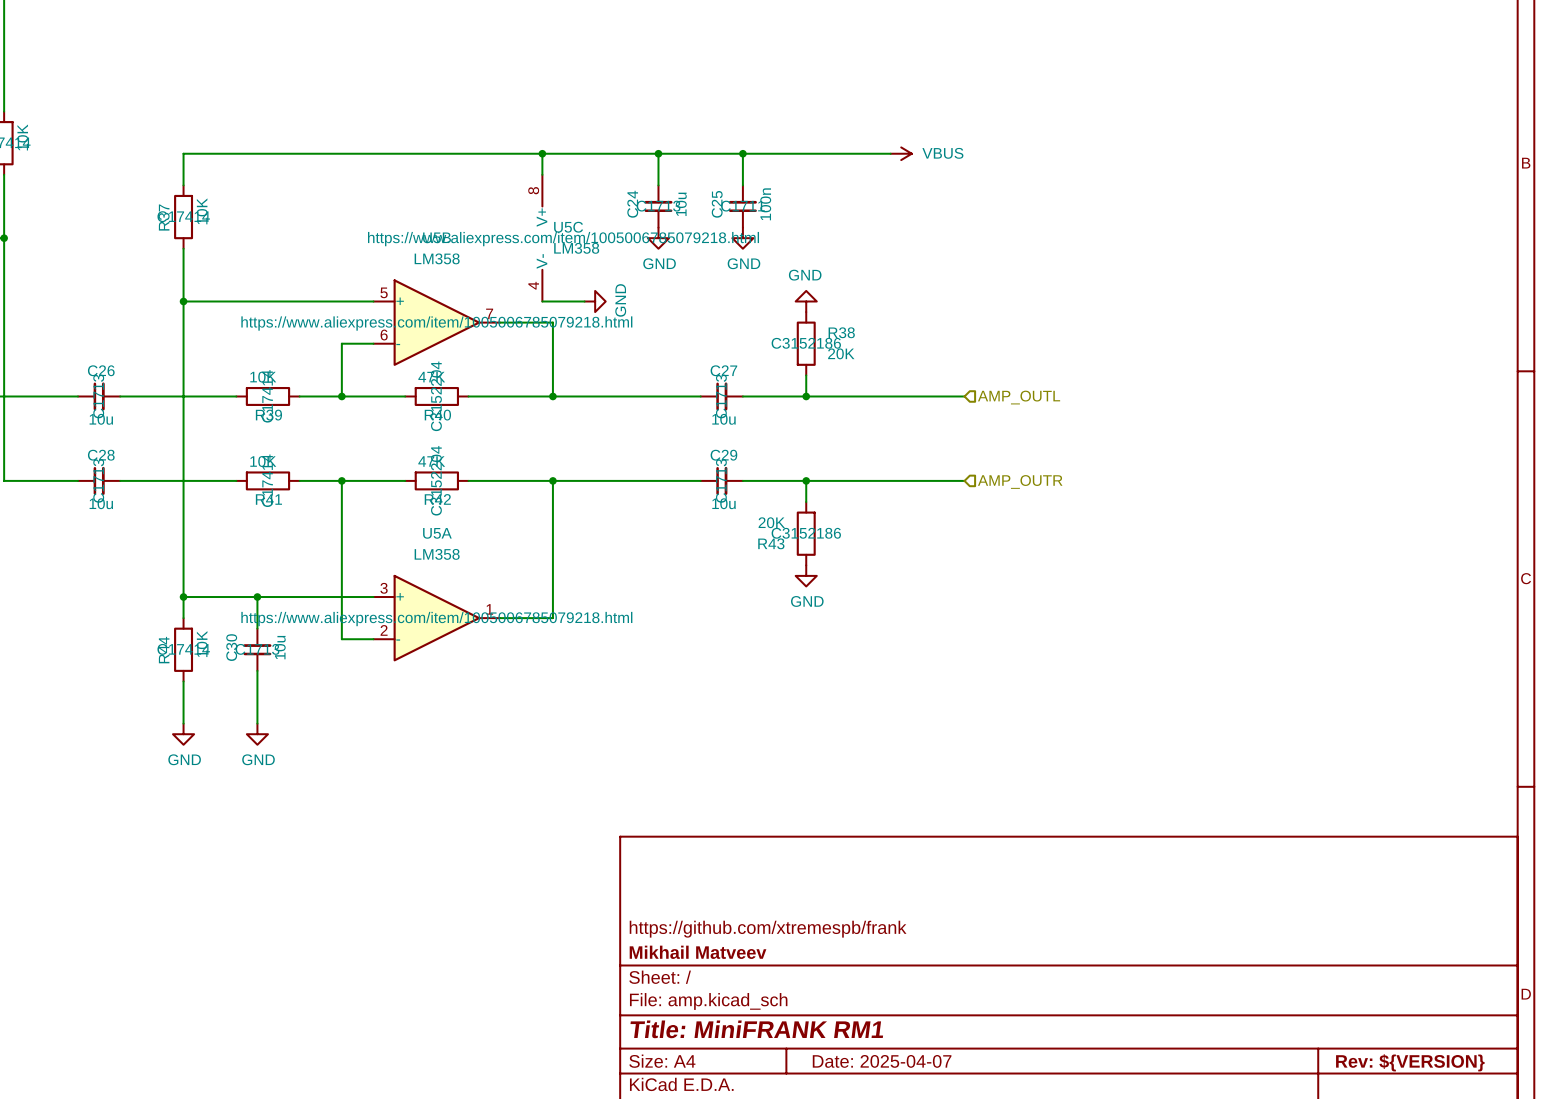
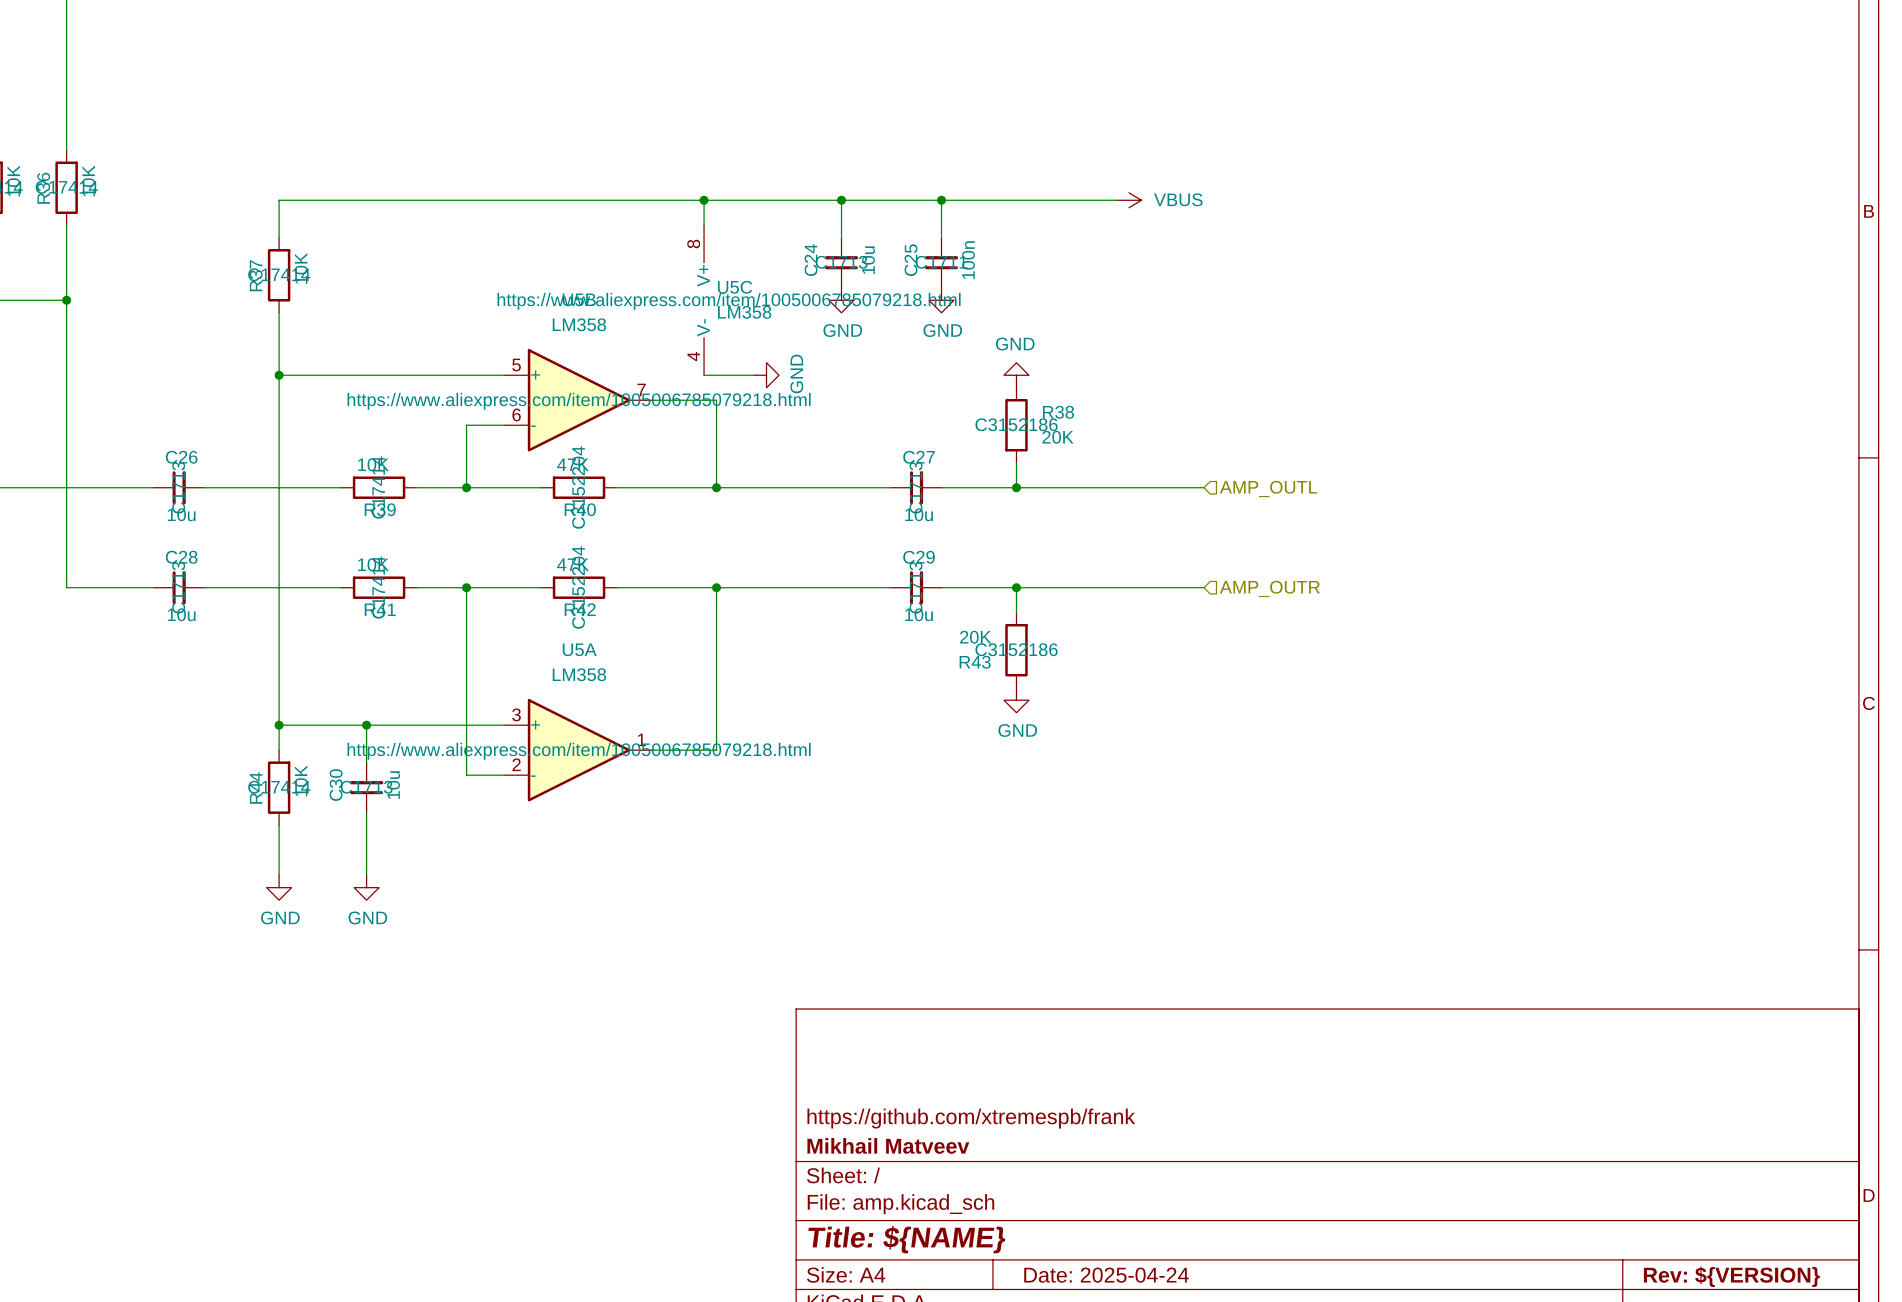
title block: Title: MiniFRANK RM1 (756, 1029) -> Title: ${NAME} (906, 1239)
title block: Date: 2025-04-07 (882, 1061) -> Date: 2025-04-24 (1106, 1275)

